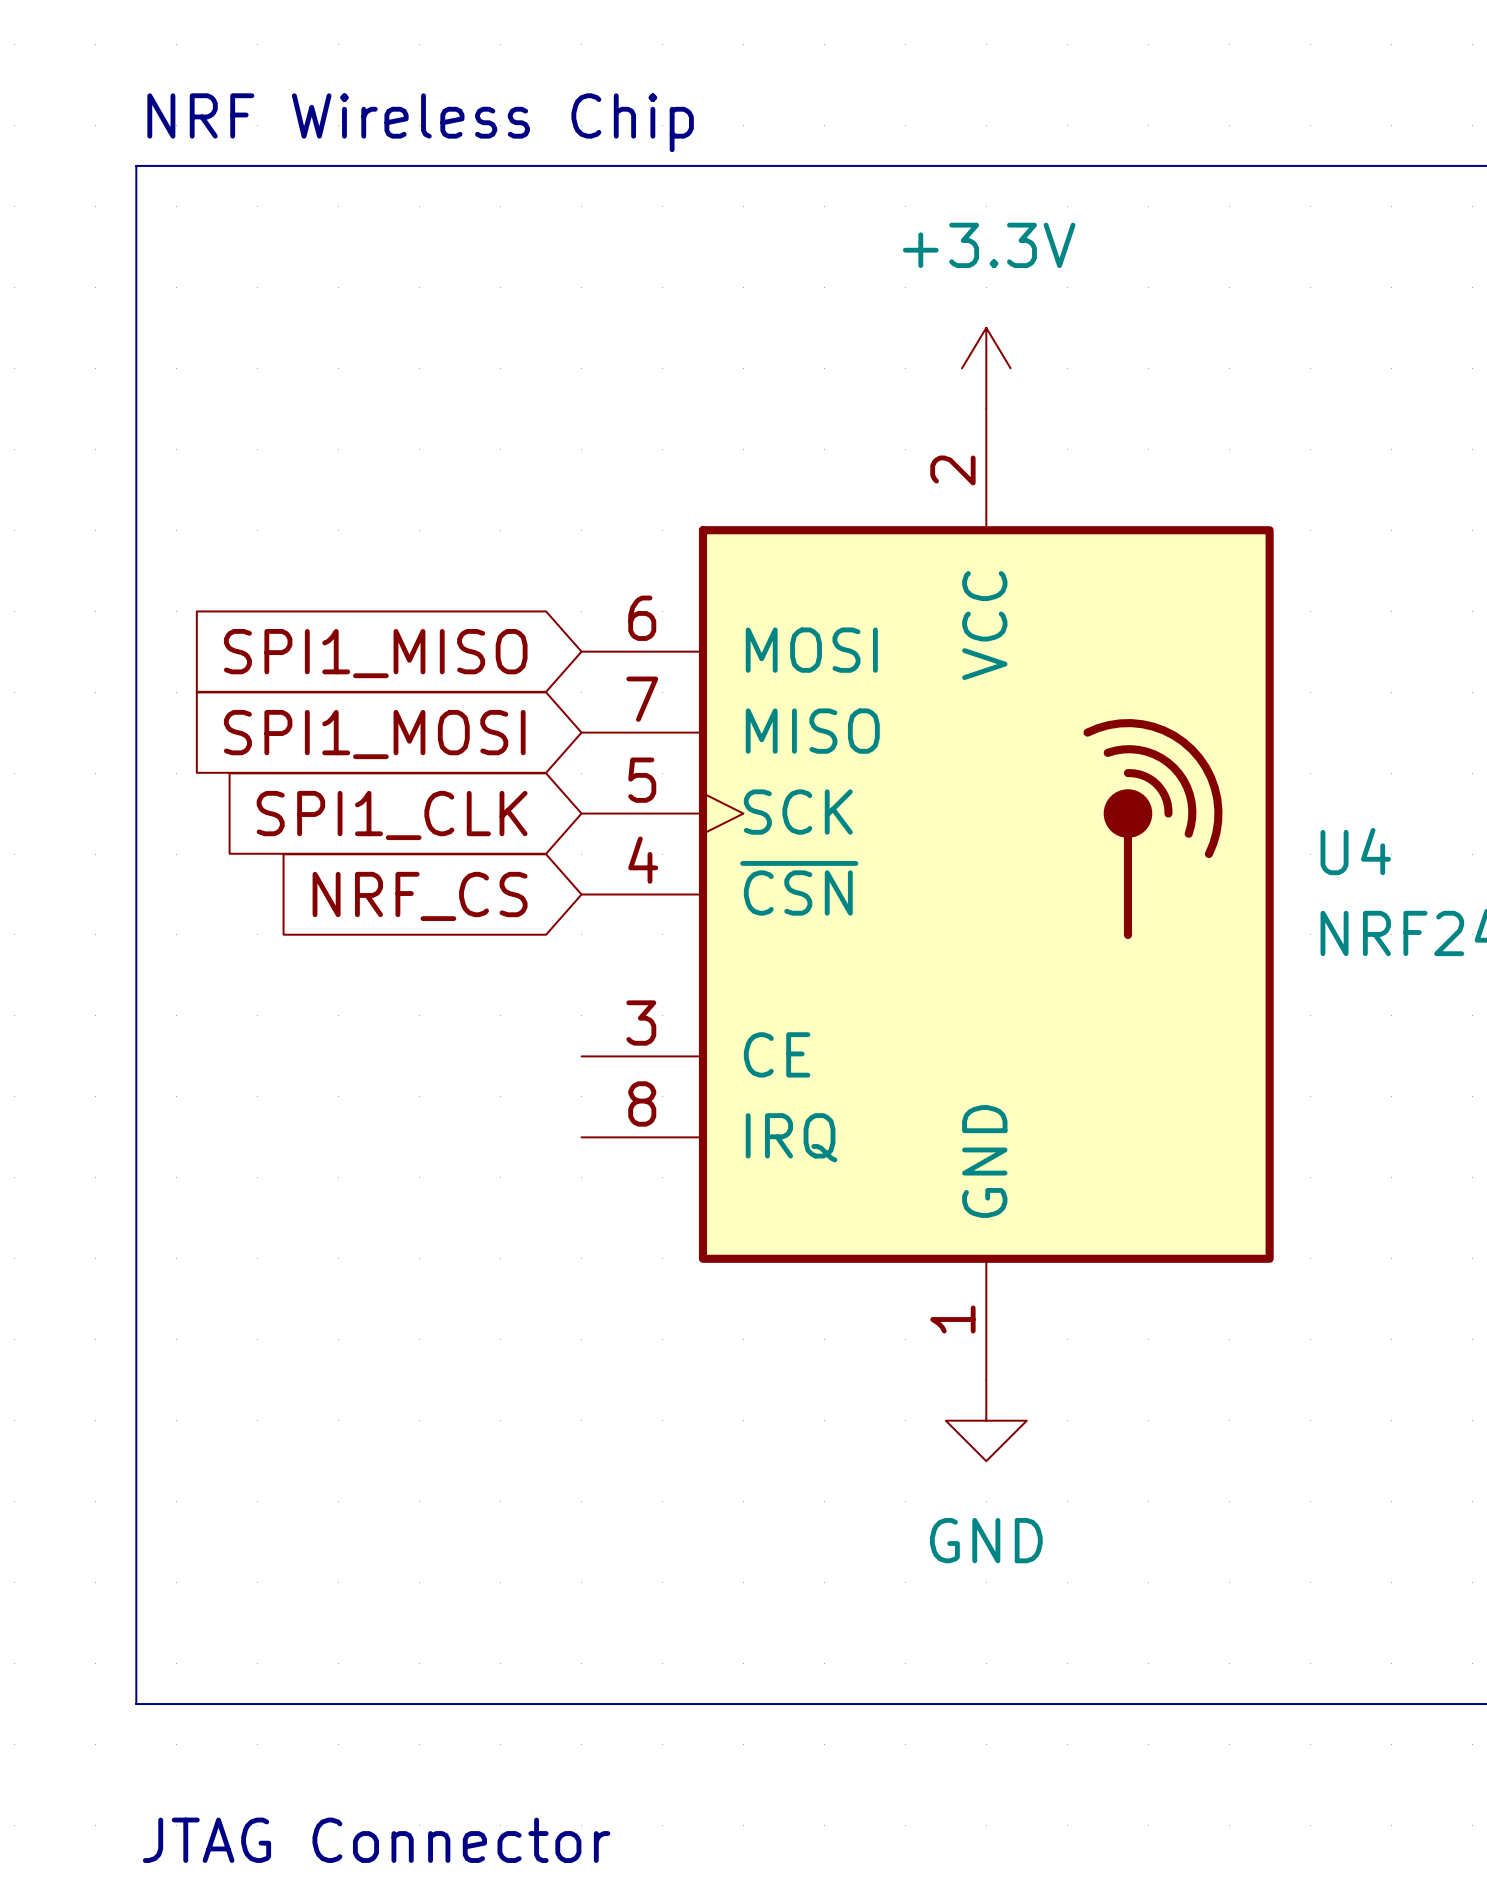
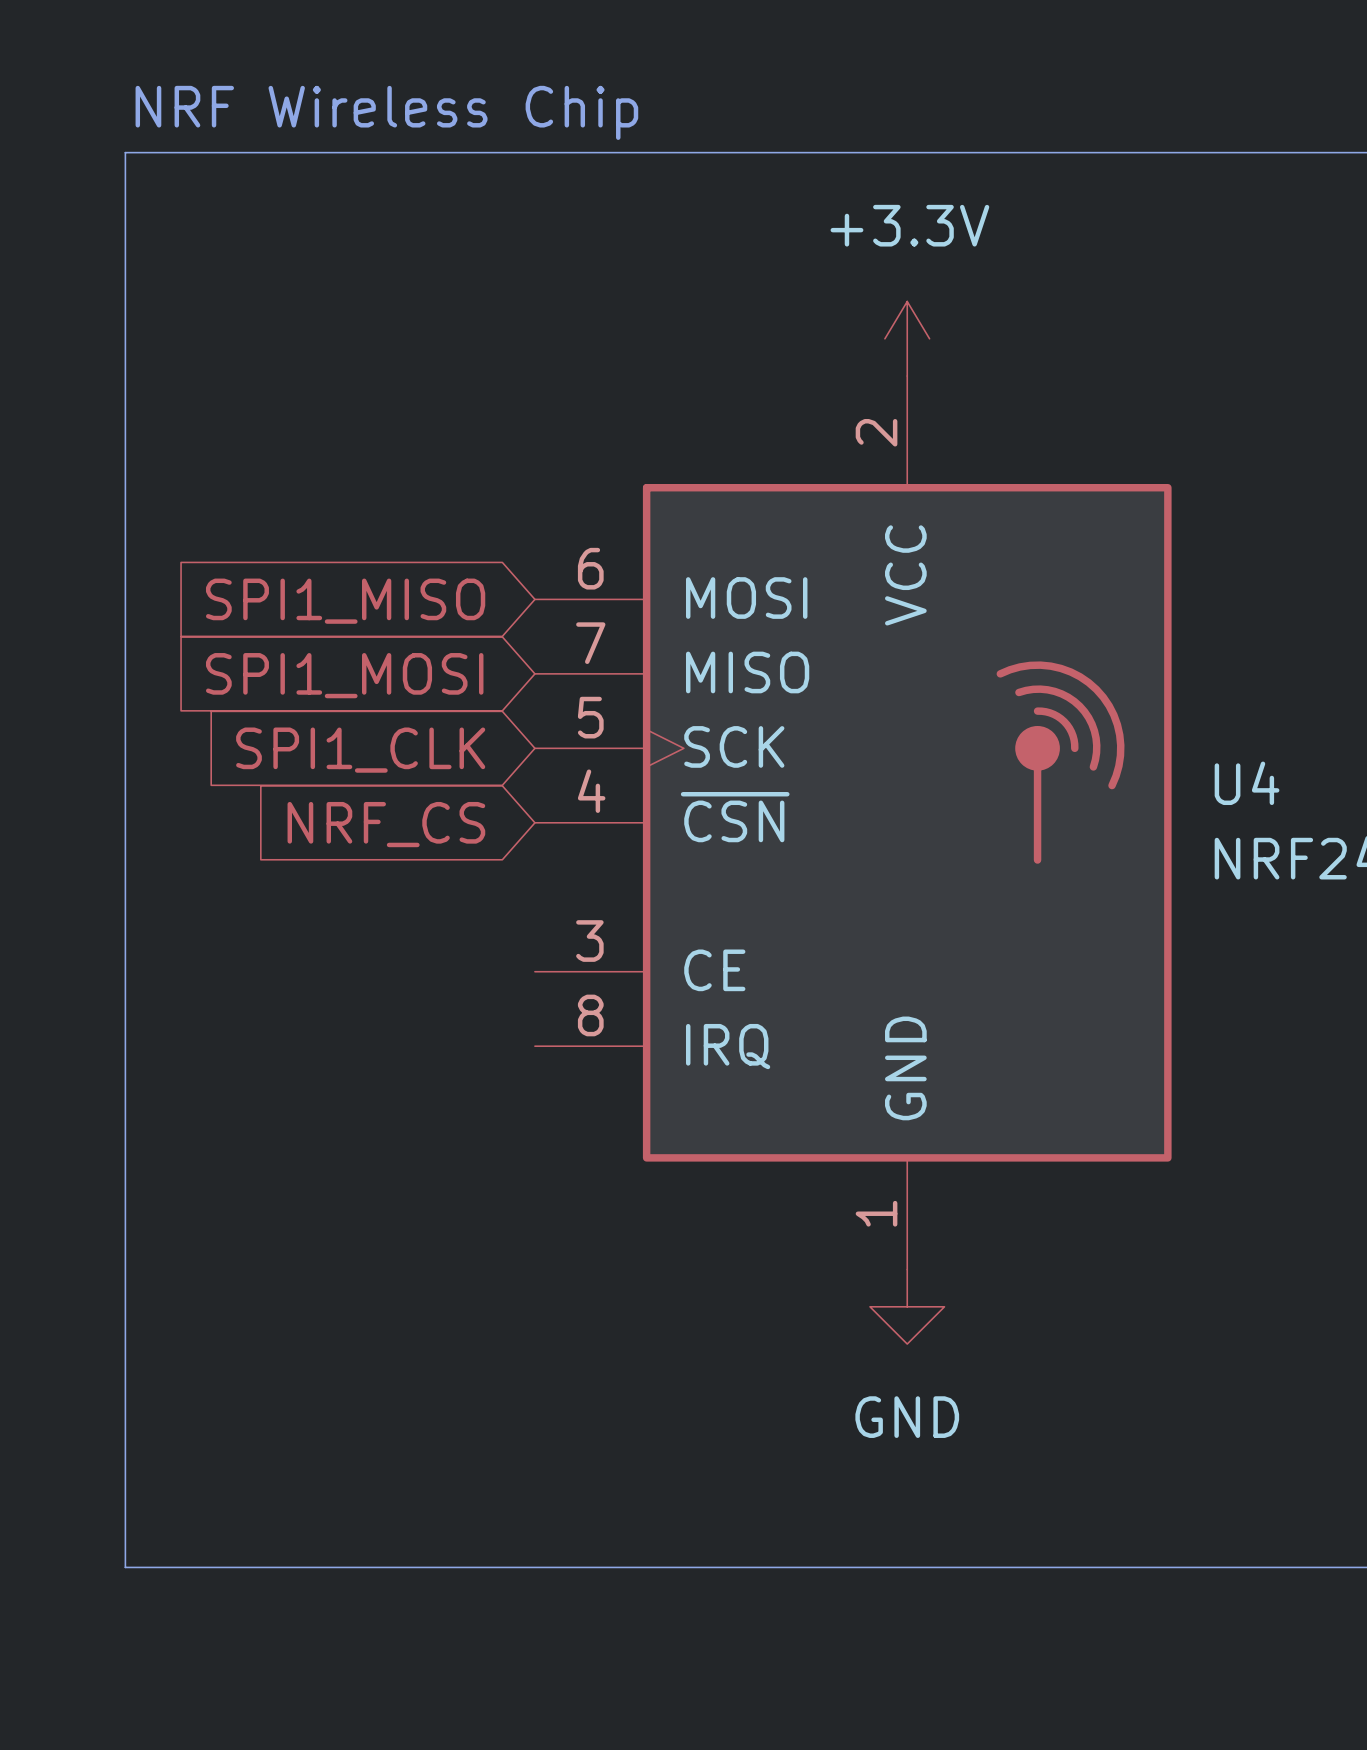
text: JTAG Connector (376, 1840) -> none

